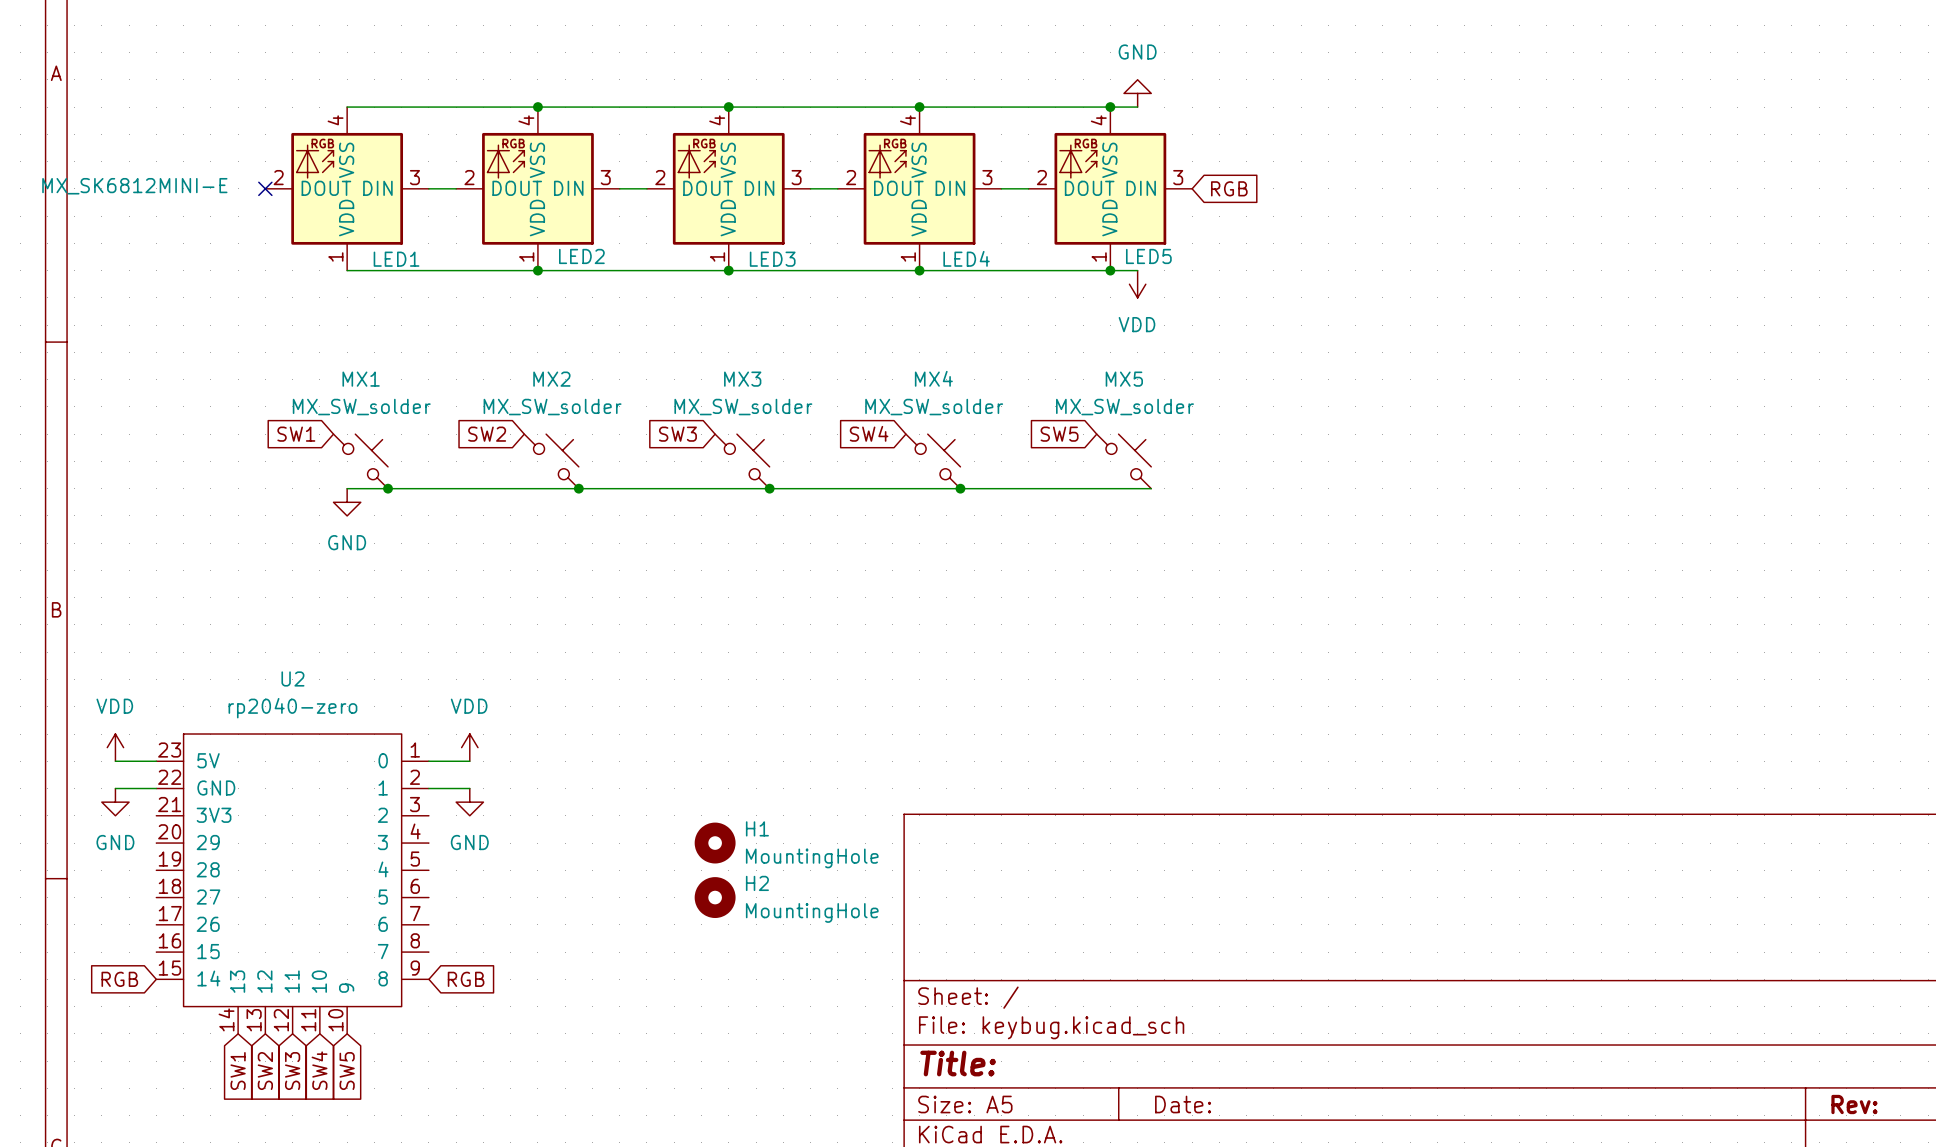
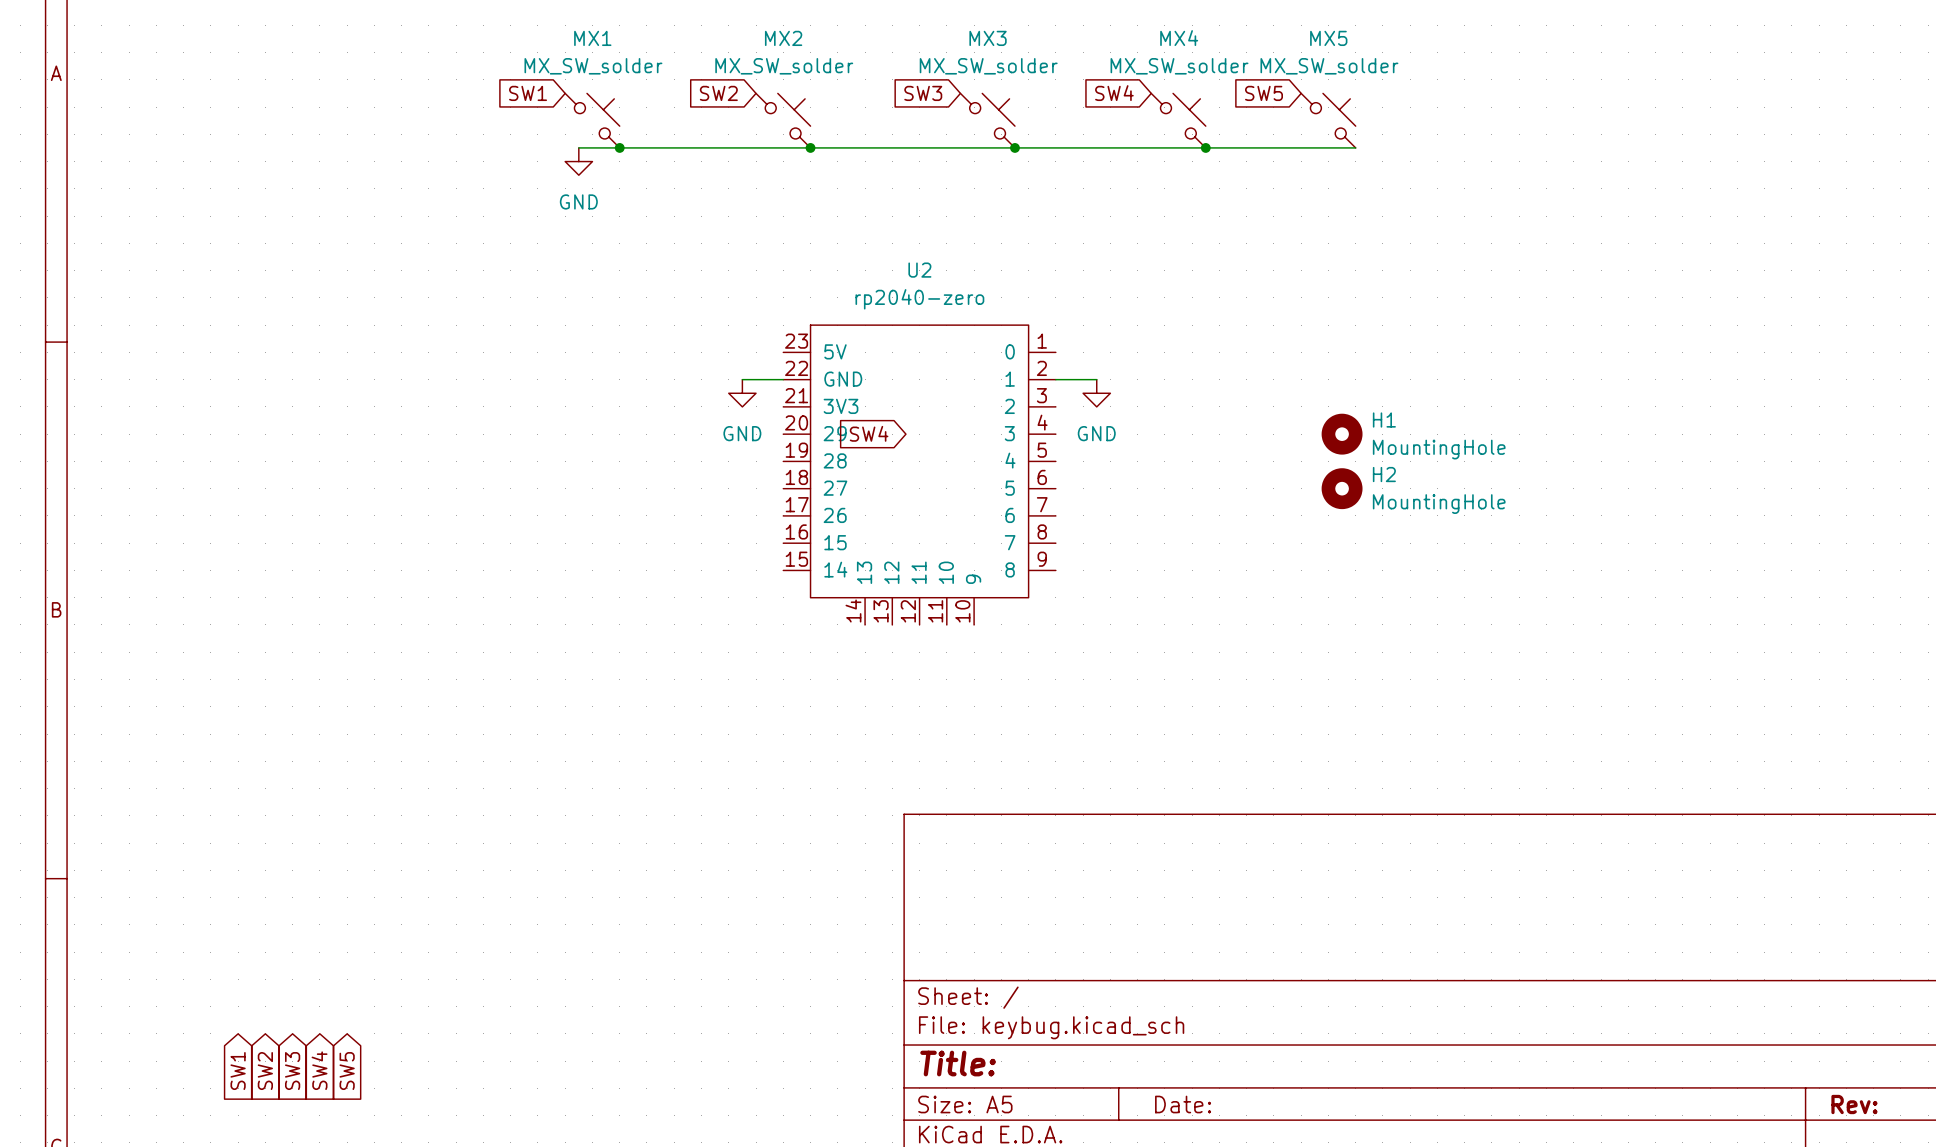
global label: none -> SW1 (528, 93)
global label: none -> SW2 (718, 93)
global label: none -> SW3 (923, 93)
global label: none -> SW4 (1114, 93)
power symbol: GND (1137, 93) -> none
global label: none -> SW5 (1264, 93)
wire: (347, 107) (1137, 107) -> none
junction: (537, 107) -> none
junction: (728, 107) -> none
junction: (919, 107) -> none
junction: (1110, 107) -> none
wire: none -> (578, 147) (1355, 147)
junction: none -> (619, 147)
junction: none -> (810, 147)
junction: none -> (1014, 147)
junction: none -> (1205, 147)
power symbol: none -> GND (578, 161)
no-connect mark: (265, 188) -> none
LED1: MX_SK6812MINI-E (347, 188) -> none
wire: (428, 188) (456, 188) -> none
LED2: (537, 188) -> none
wire: (619, 188) (646, 188) -> none
LED3: (728, 188) -> none
wire: (810, 188) (837, 188) -> none
LED4: (919, 188) -> none
wire: (1001, 188) (1028, 188) -> none
LED5: (1110, 188) -> none
global label: RGB (1229, 188) -> none
wire: (347, 270) (1137, 270) -> none
junction: (537, 270) -> none
junction: (728, 270) -> none
junction: (919, 270) -> none
junction: (1110, 270) -> none
power symbol: VDD (1137, 284) -> none
wire: none -> (742, 379) (783, 379)
wire: none -> (1055, 379) (1096, 379)
power symbol: none -> GND (742, 393)
power symbol: none -> GND (1096, 393)
global label: SW1 (296, 434) -> none
global label: SW2 (487, 434) -> none
global label: SW3 (677, 434) -> none
global label: SW5 (1059, 434) -> none
MX1 position: (360, 461) -> (592, 120)
MX2 position: (551, 461) -> (783, 120)
MX3 position: (742, 461) -> (987, 120)
MX4 position: (933, 461) -> (1178, 120)
MX5 position: (1124, 461) -> (1328, 120)
wire: (347, 488) (1151, 488) -> none
junction: (388, 488) -> none
junction: (578, 488) -> none
junction: (769, 488) -> none
junction: (960, 488) -> none
power symbol: GND (347, 502) -> none
power symbol: VDD (115, 747) -> none
power symbol: VDD (469, 747) -> none
wire: (115, 761) (156, 761) -> none
wire: (428, 761) (469, 761) -> none
wire: (115, 788) (156, 788) -> none
wire: (428, 788) (469, 788) -> none
power symbol: GND (115, 802) -> none
power symbol: GND (469, 802) -> none
H1 position: (715, 843) -> (1342, 434)
U2 position: (292, 883) -> (919, 475)
H2 position: (715, 897) -> (1342, 488)
global label: RGB (119, 979) -> none
global label: RGB (466, 979) -> none

